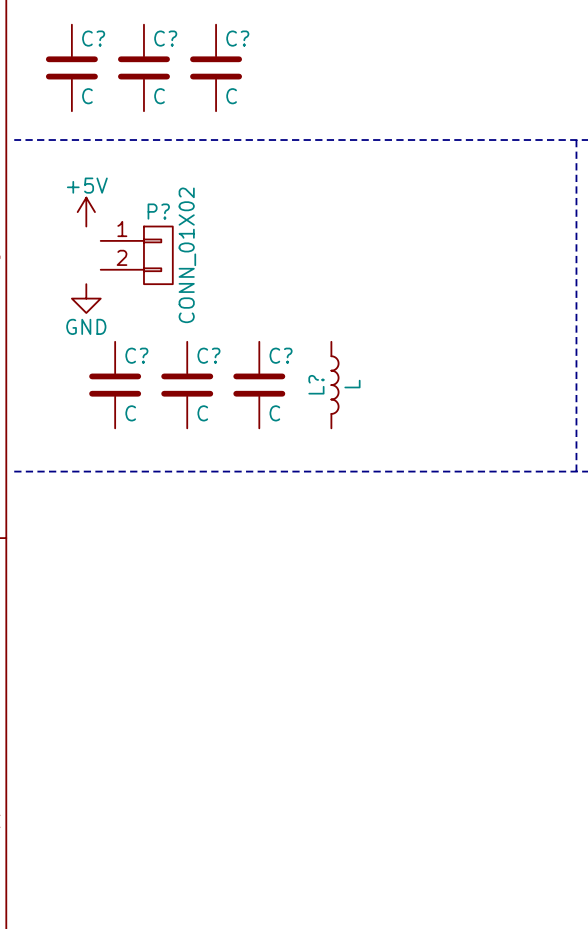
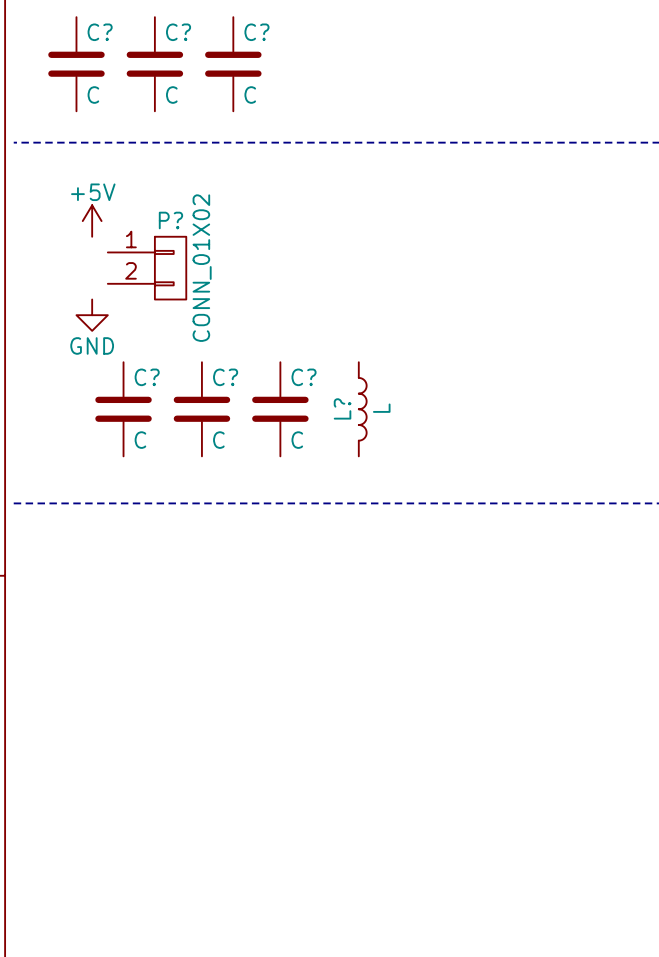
line: (576, 140) (576, 471) -> none

